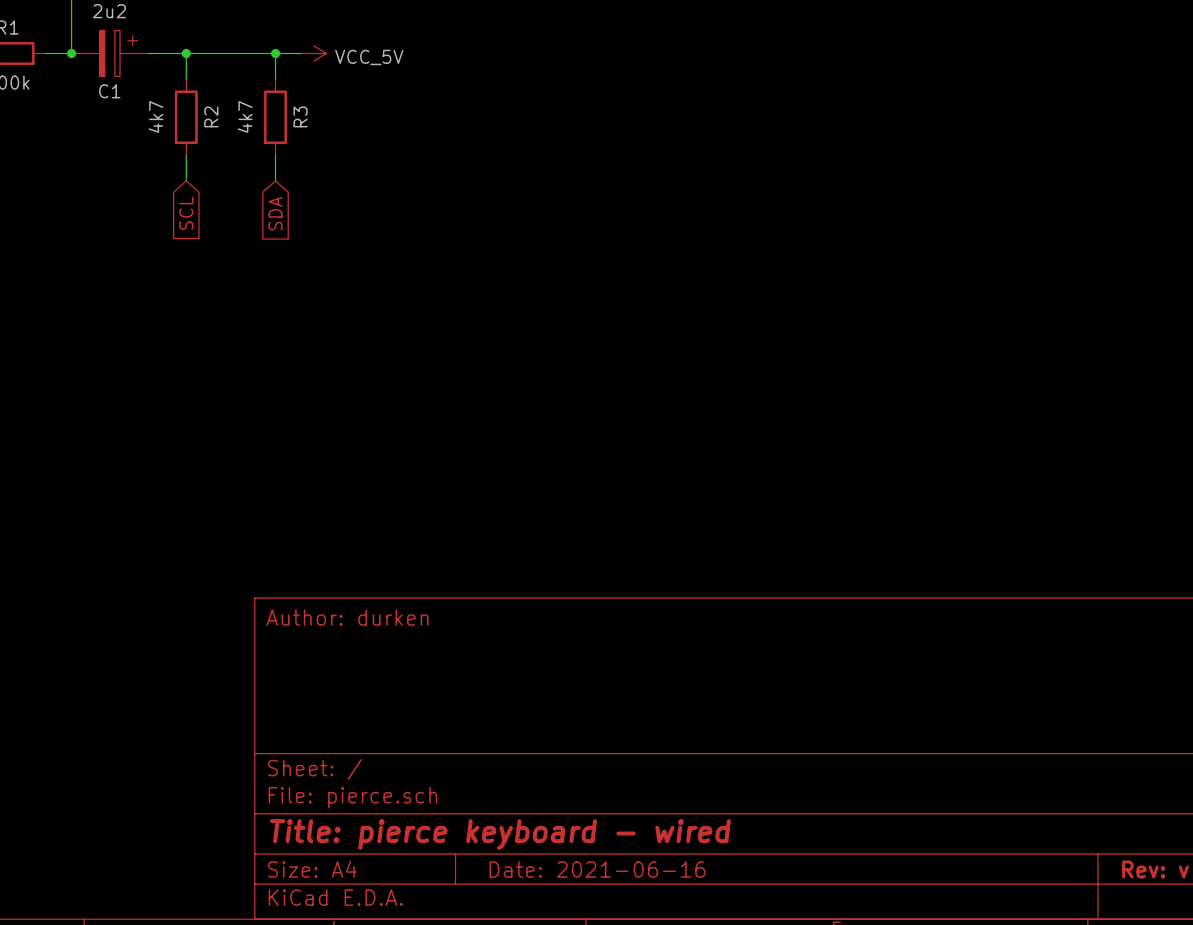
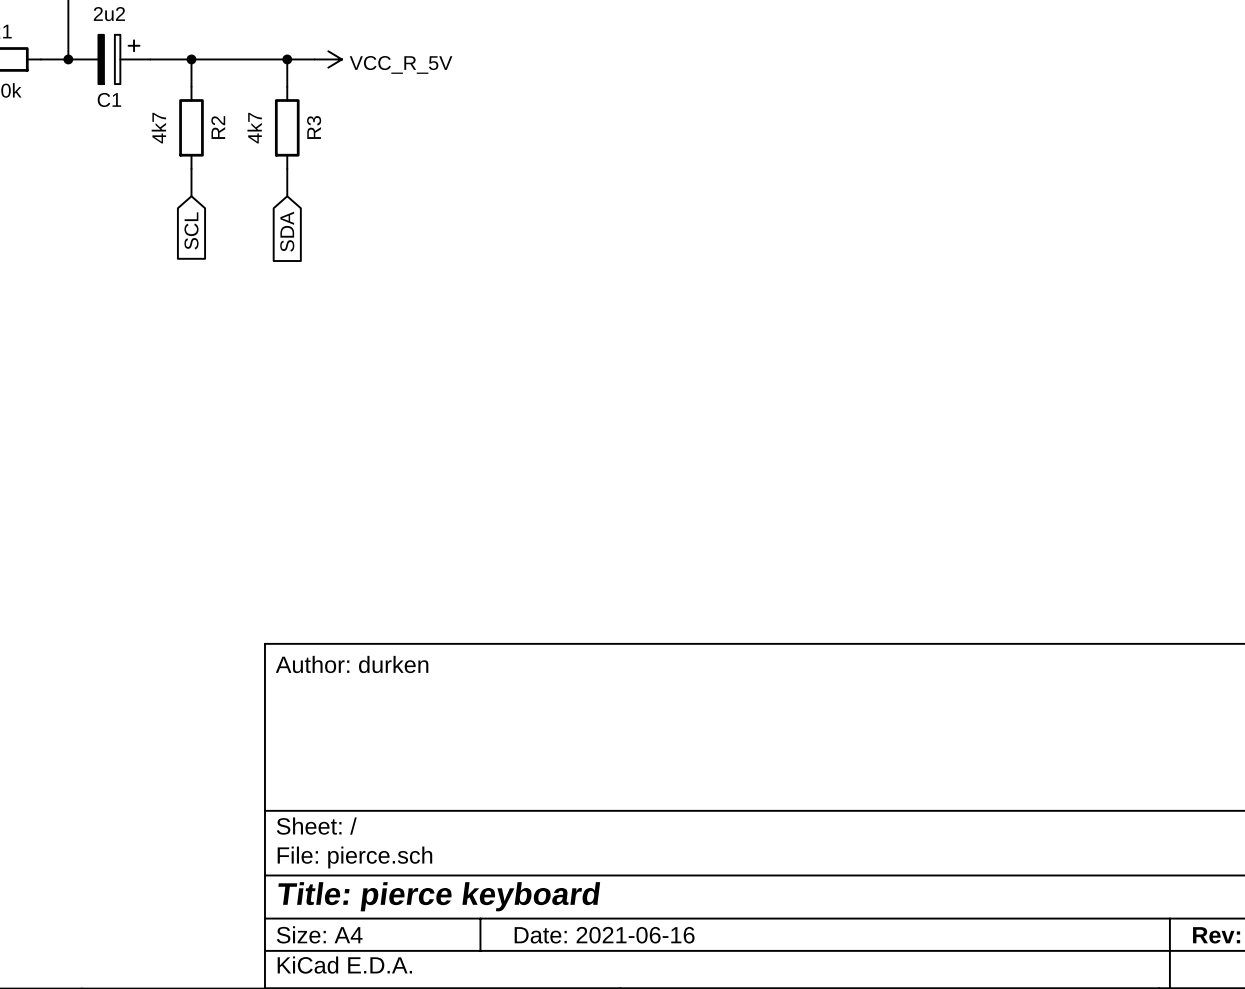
power symbol: VCC_5V (313, 53) -> VCC_R_5V (328, 59)
title block: Title: pierce keyboard - wired (500, 834) -> Title: pierce keyboard (439, 896)

